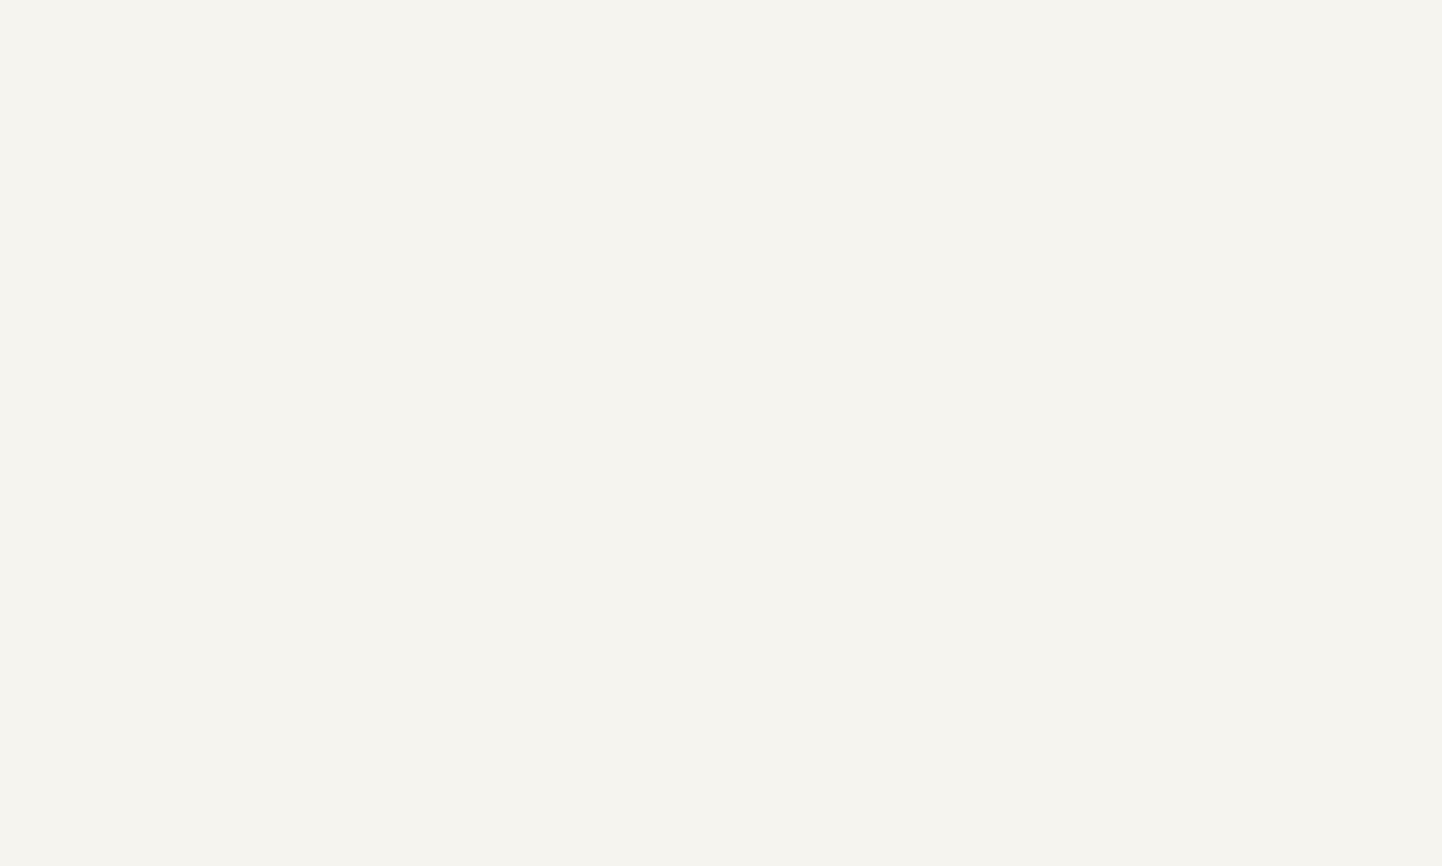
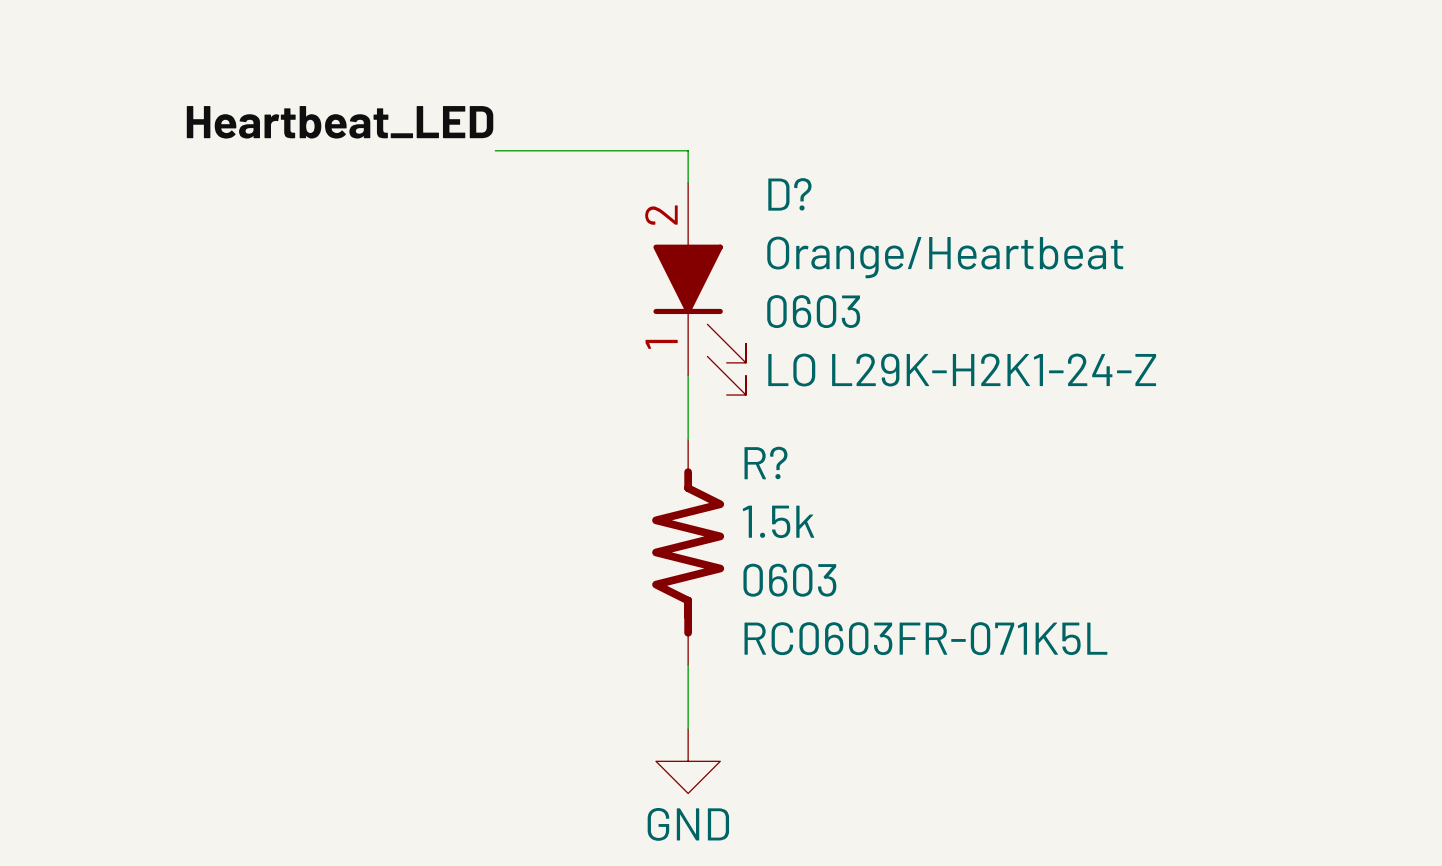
label: none -> Heartbeat_LED (340, 122)
wire: none -> (495, 150) (688, 150) (688, 182)
D?: none -> Orange/Heartbeat (699, 288)
wire: none -> (688, 375) (688, 439)
R?: none -> 1.5k (688, 552)
wire: none -> (688, 664) (688, 729)
power symbol: none -> GND (688, 761)

